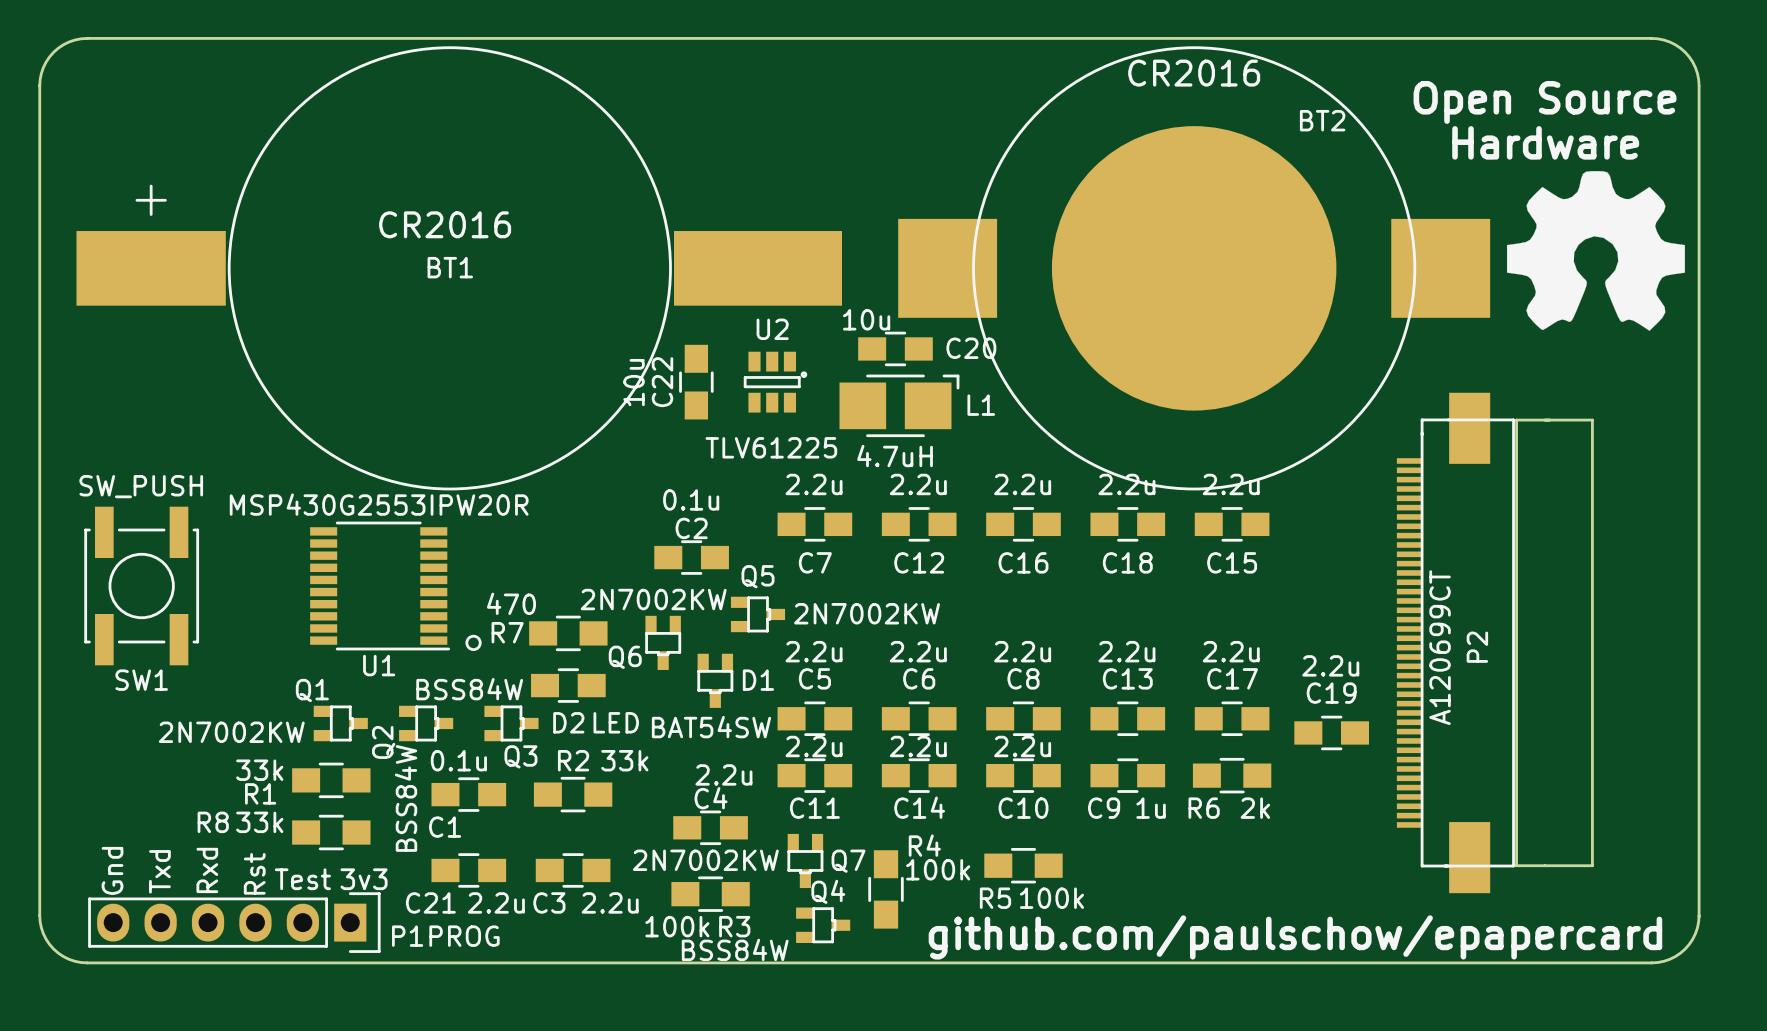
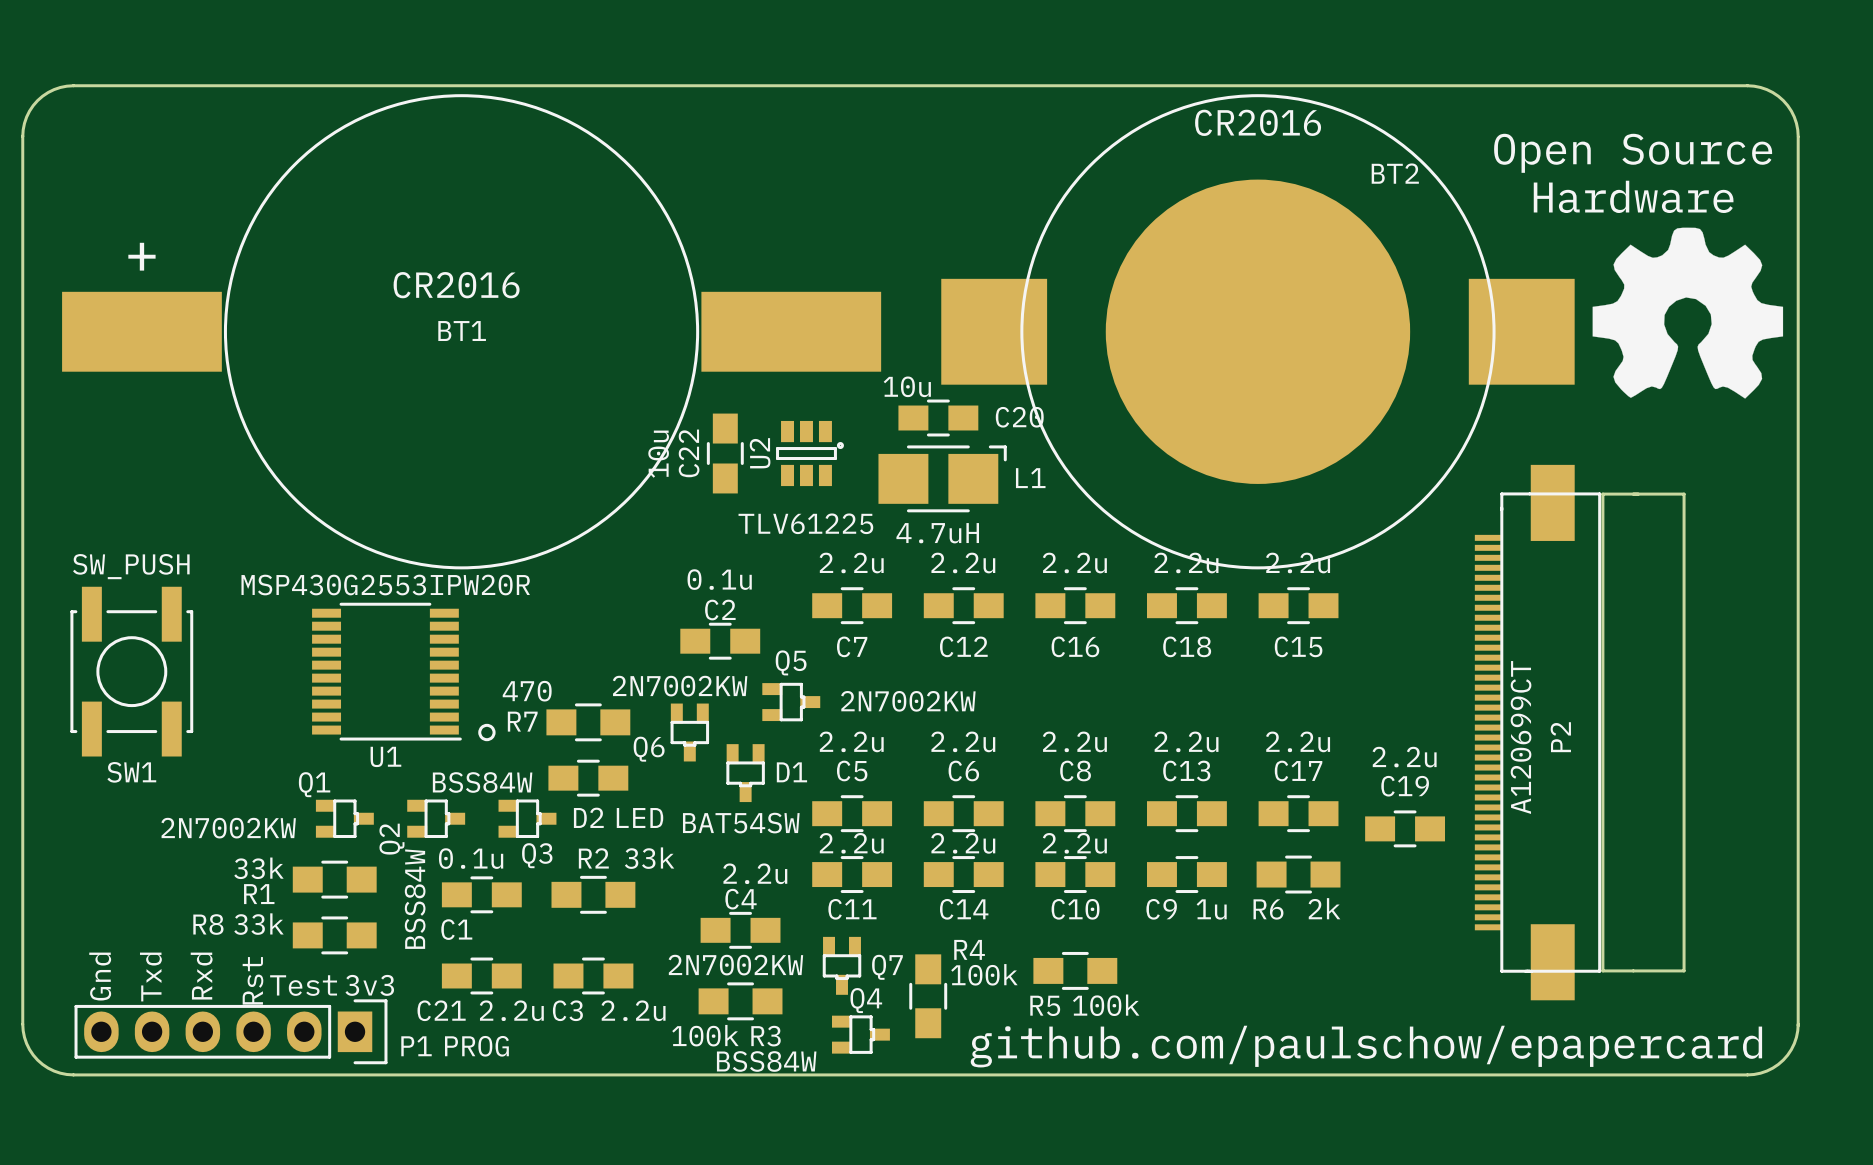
U2 name rotation: 0° (772, 329) -> 90° counterclockwise (760, 453)
U2 name position: U2 (772, 329) -> U2 (760, 453)

